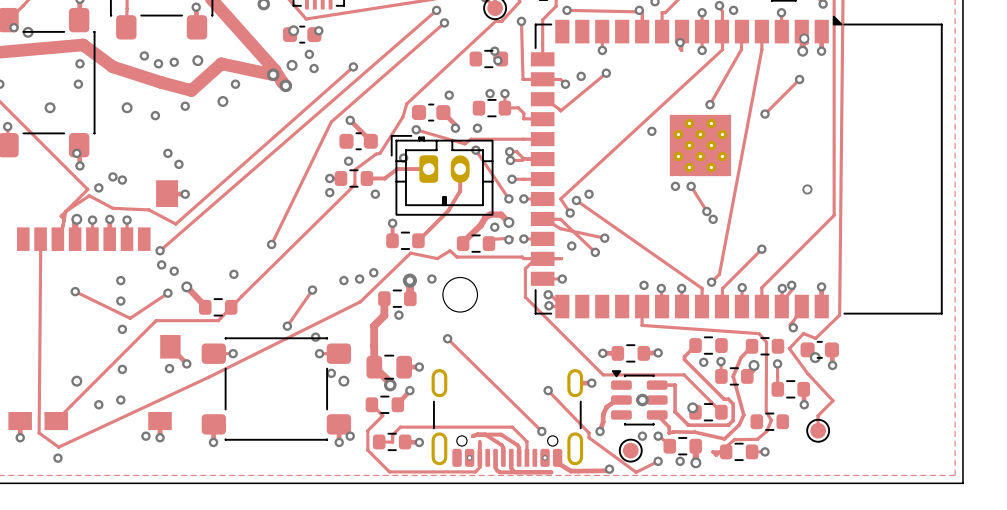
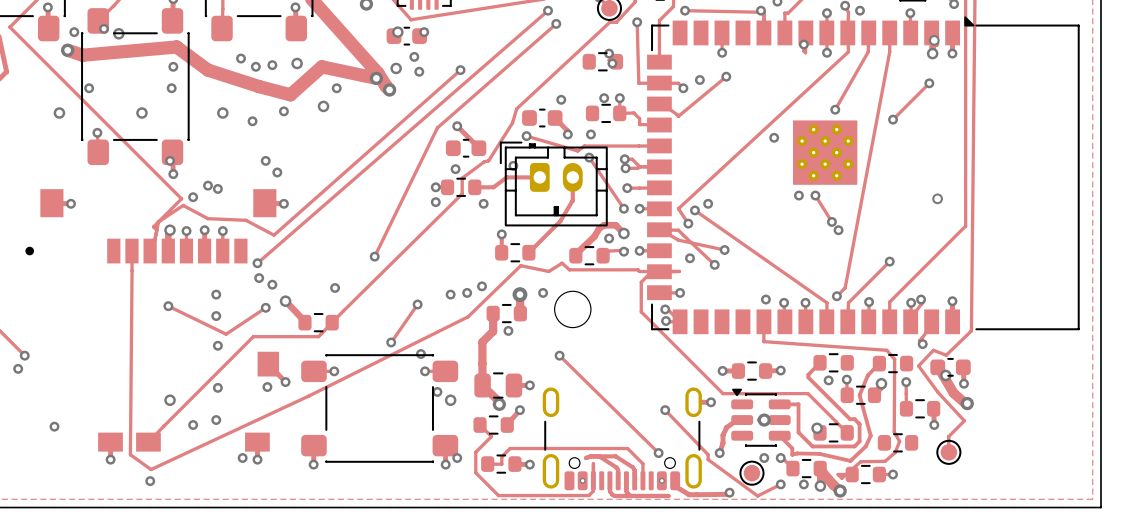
track: none -> (940, 370) (953, 393) (967, 405) (967, 403)
via: none -> (967, 403)
track: none -> (821, 471) (840, 491)
via: none -> (840, 491)

